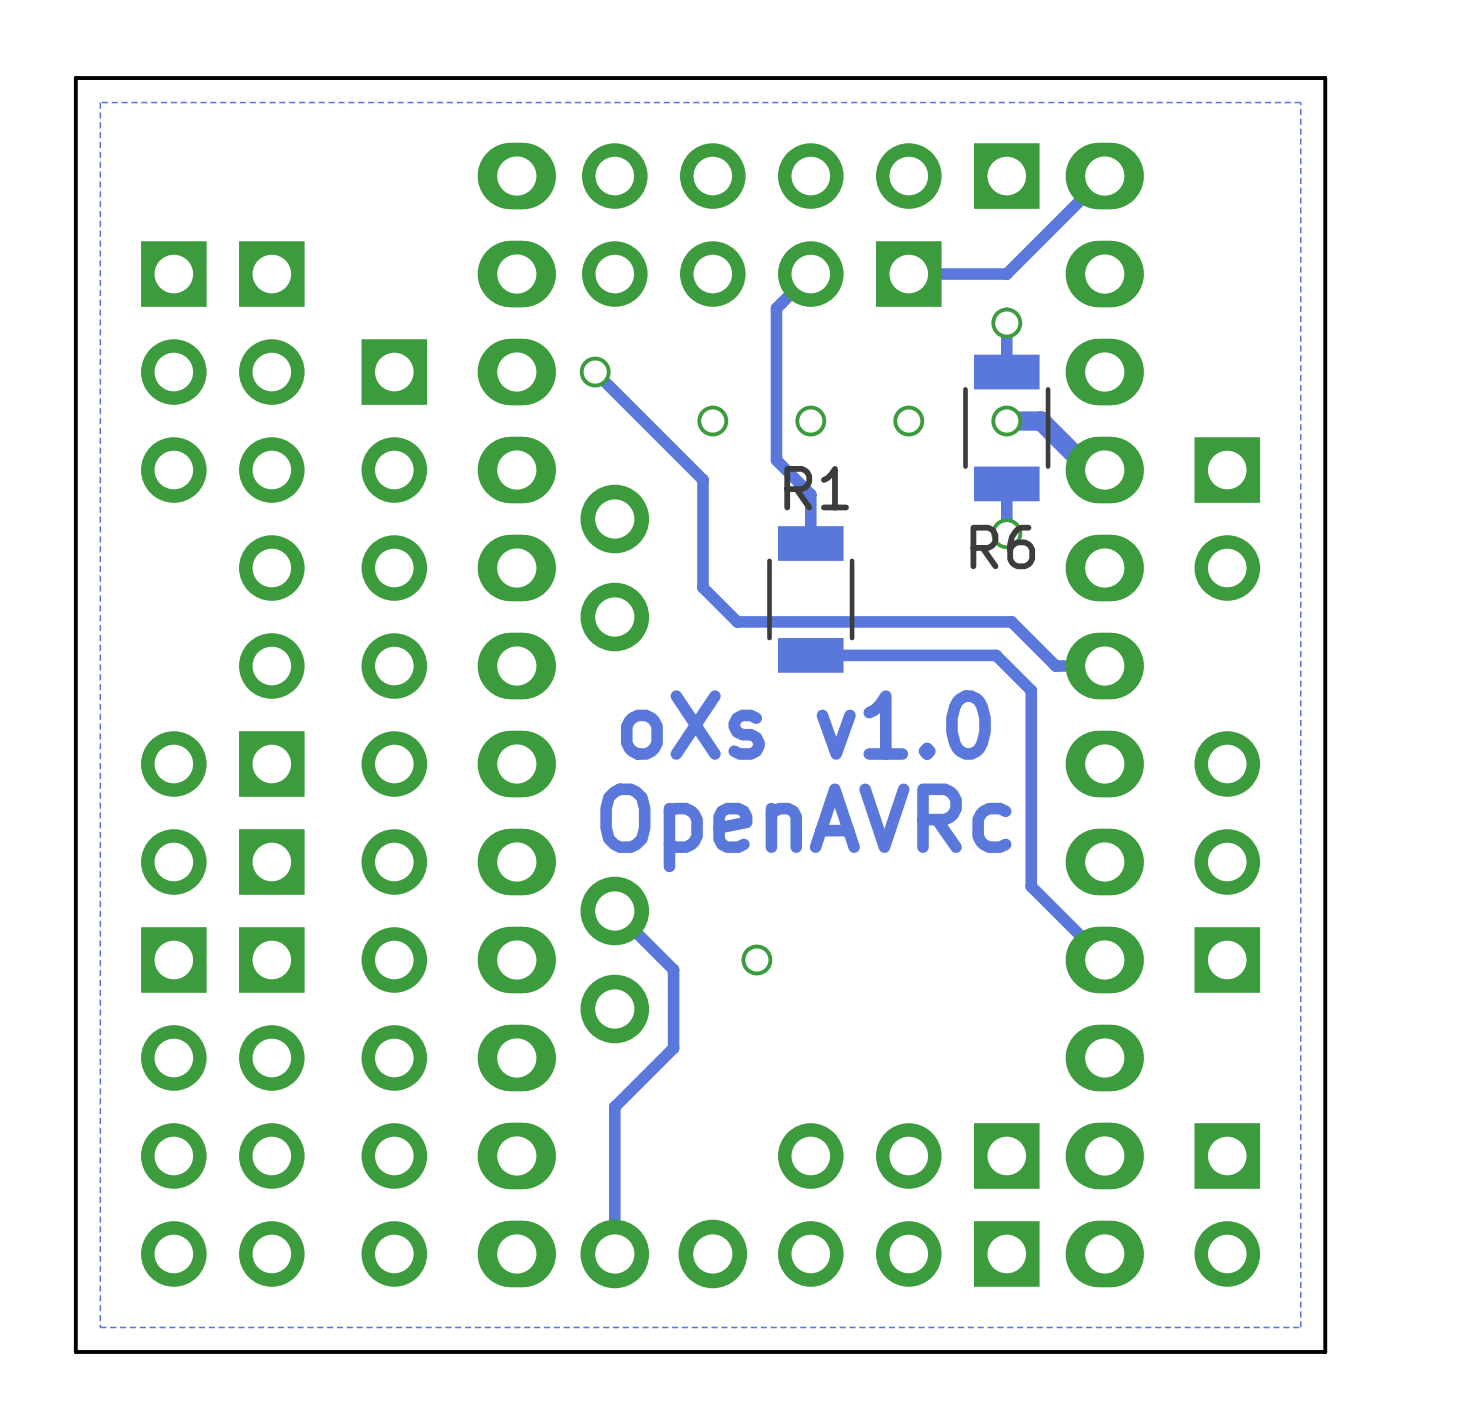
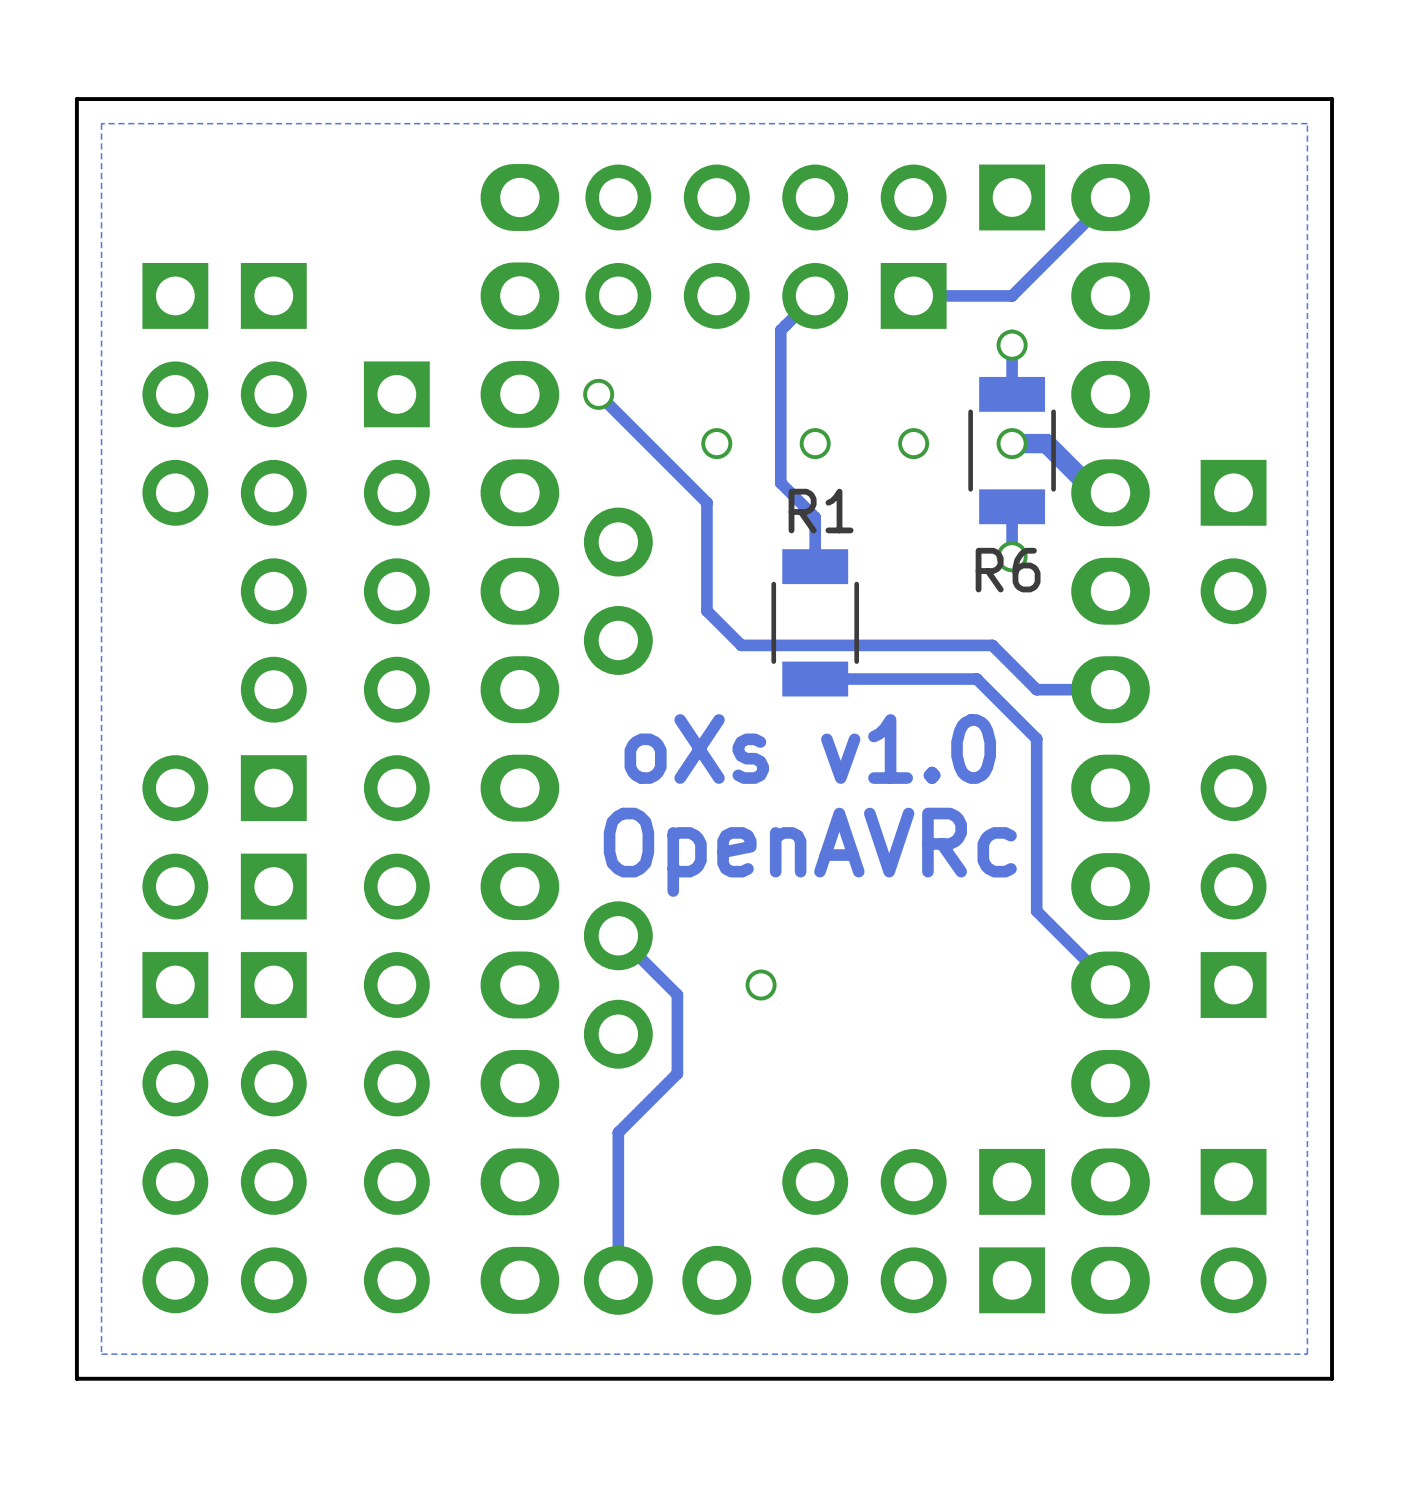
track: (987, 621) (1011, 621) (1055, 666) -> (992, 645) (1036, 689) (1061, 689)
track: (971, 655) (996, 655) (1031, 690) (1031, 715) -> (976, 679) (1036, 738)

